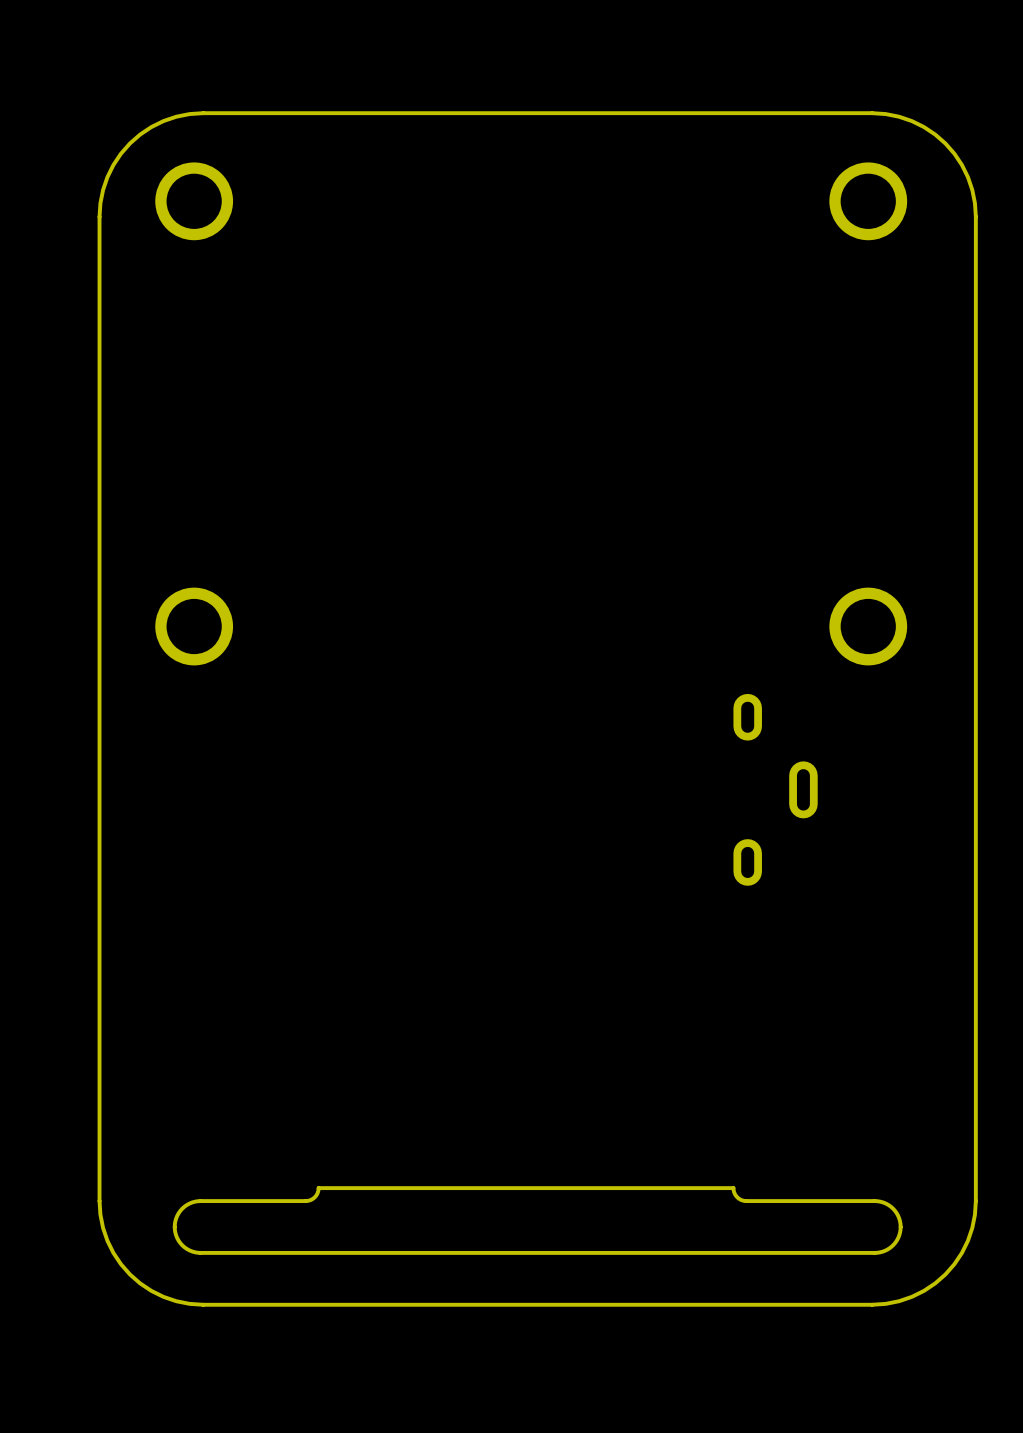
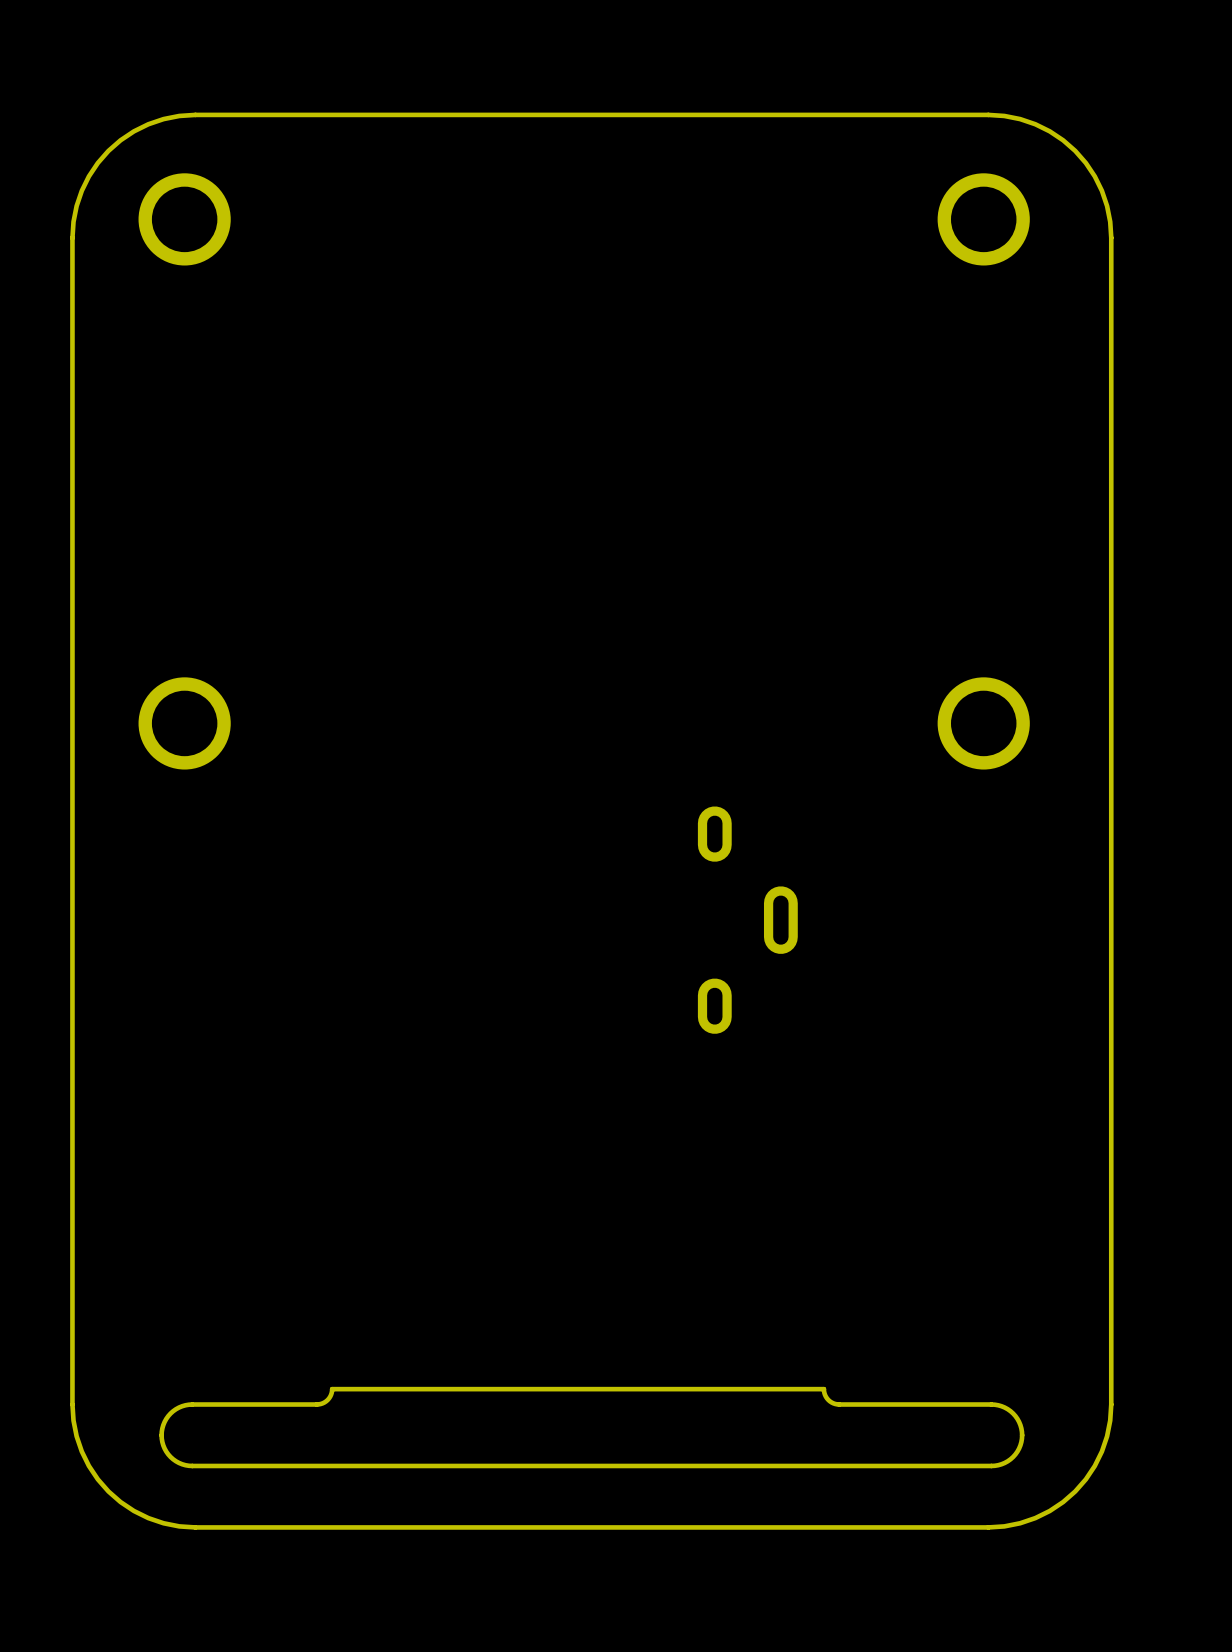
part position: (775, 789) -> (747, 920)

